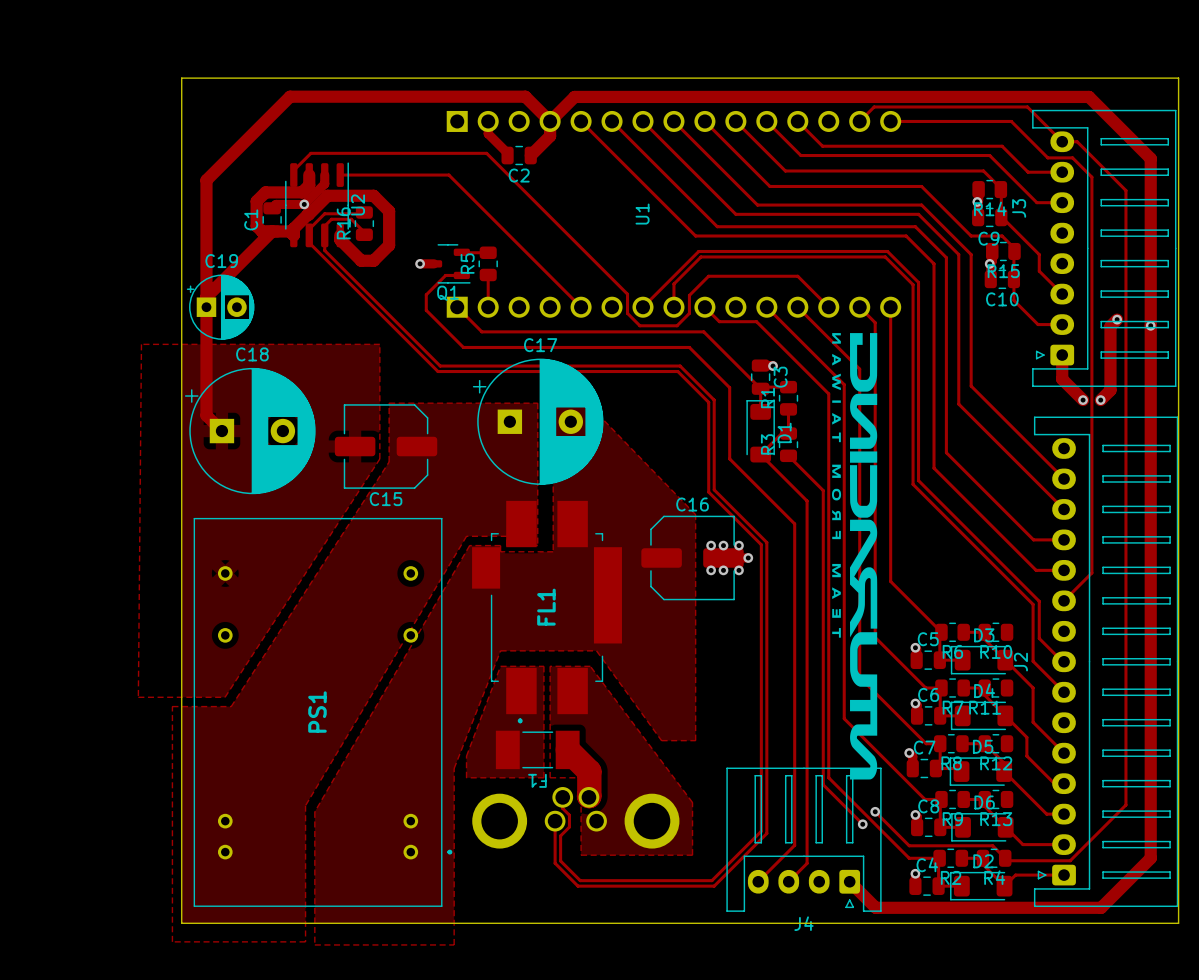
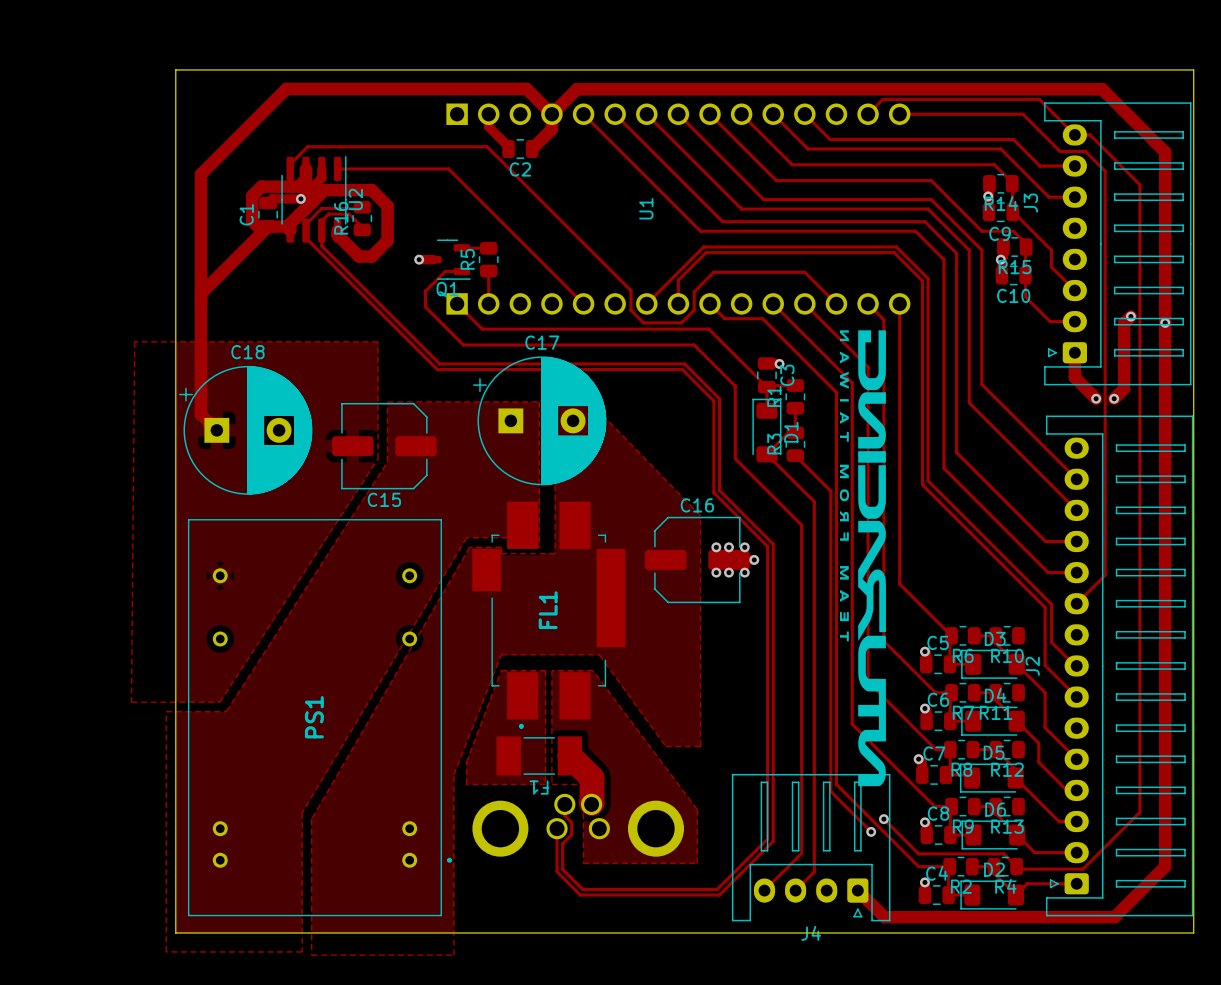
C19: (220, 307) -> none

